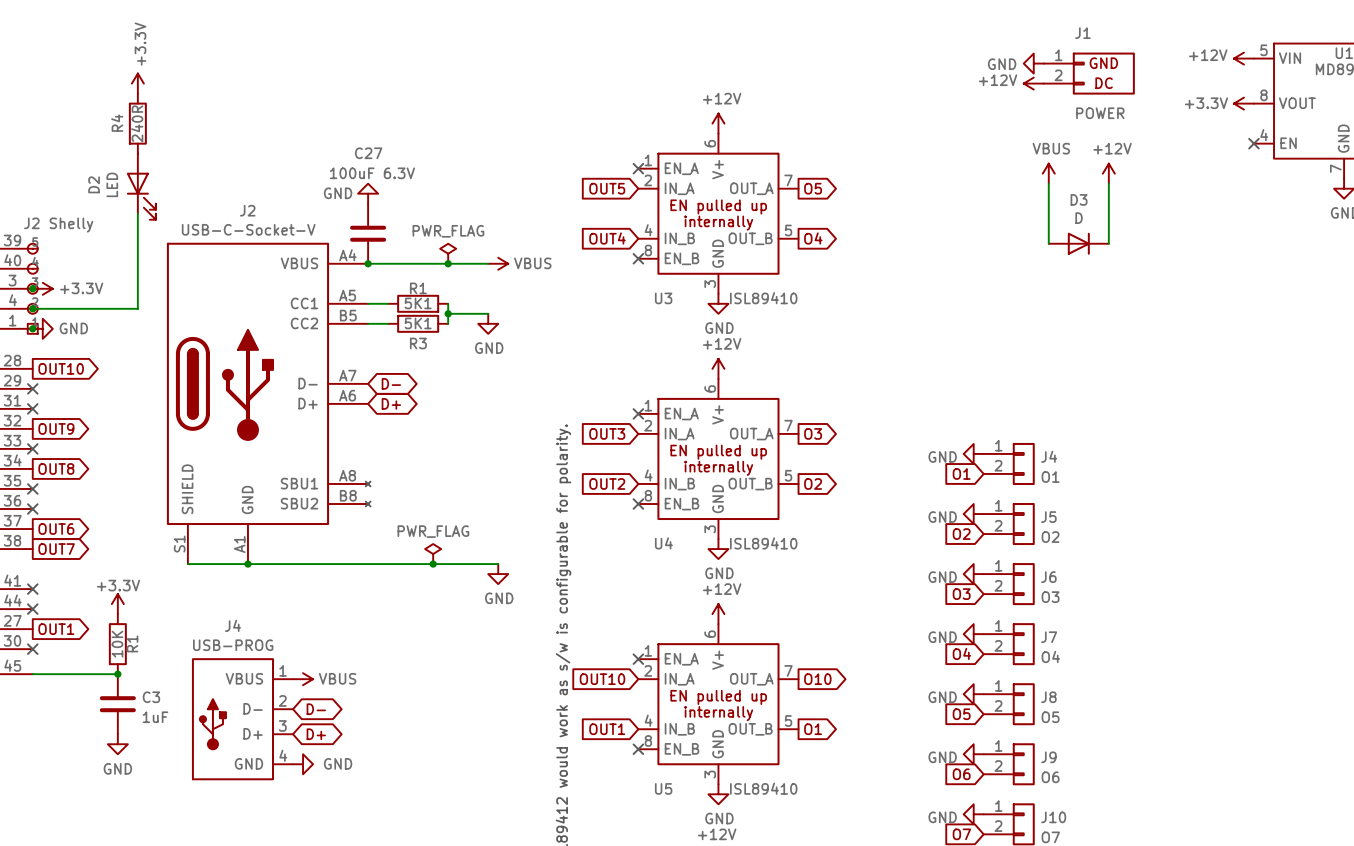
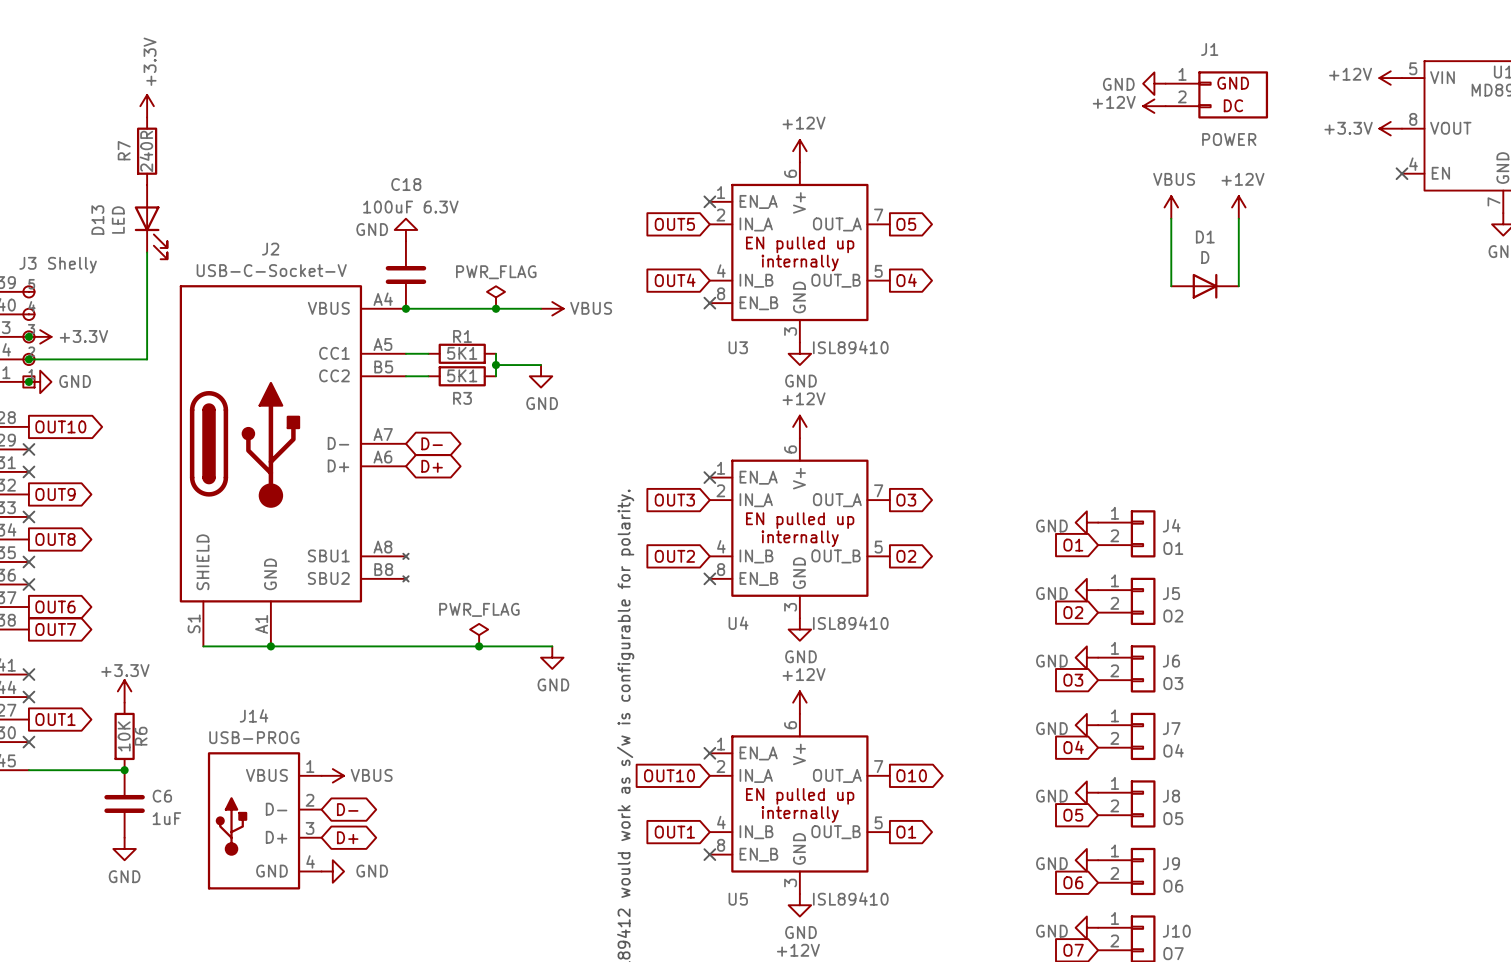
R4 name: R4 (117, 123) -> R7 (124, 150)
C27 name: C27 (368, 153) -> C18 (406, 184)
D2 name: D2 (94, 184) -> D13 (97, 220)
D3 name: D3 (1079, 199) -> D1 (1205, 236)
J2 name: J2 (31, 223) -> J3 (27, 263)
J4 name: J4 (232, 625) -> J14 (254, 715)
R1 name: R1 (132, 643) -> R6 (141, 736)
C3 name: C3 (151, 697) -> C6 (162, 796)

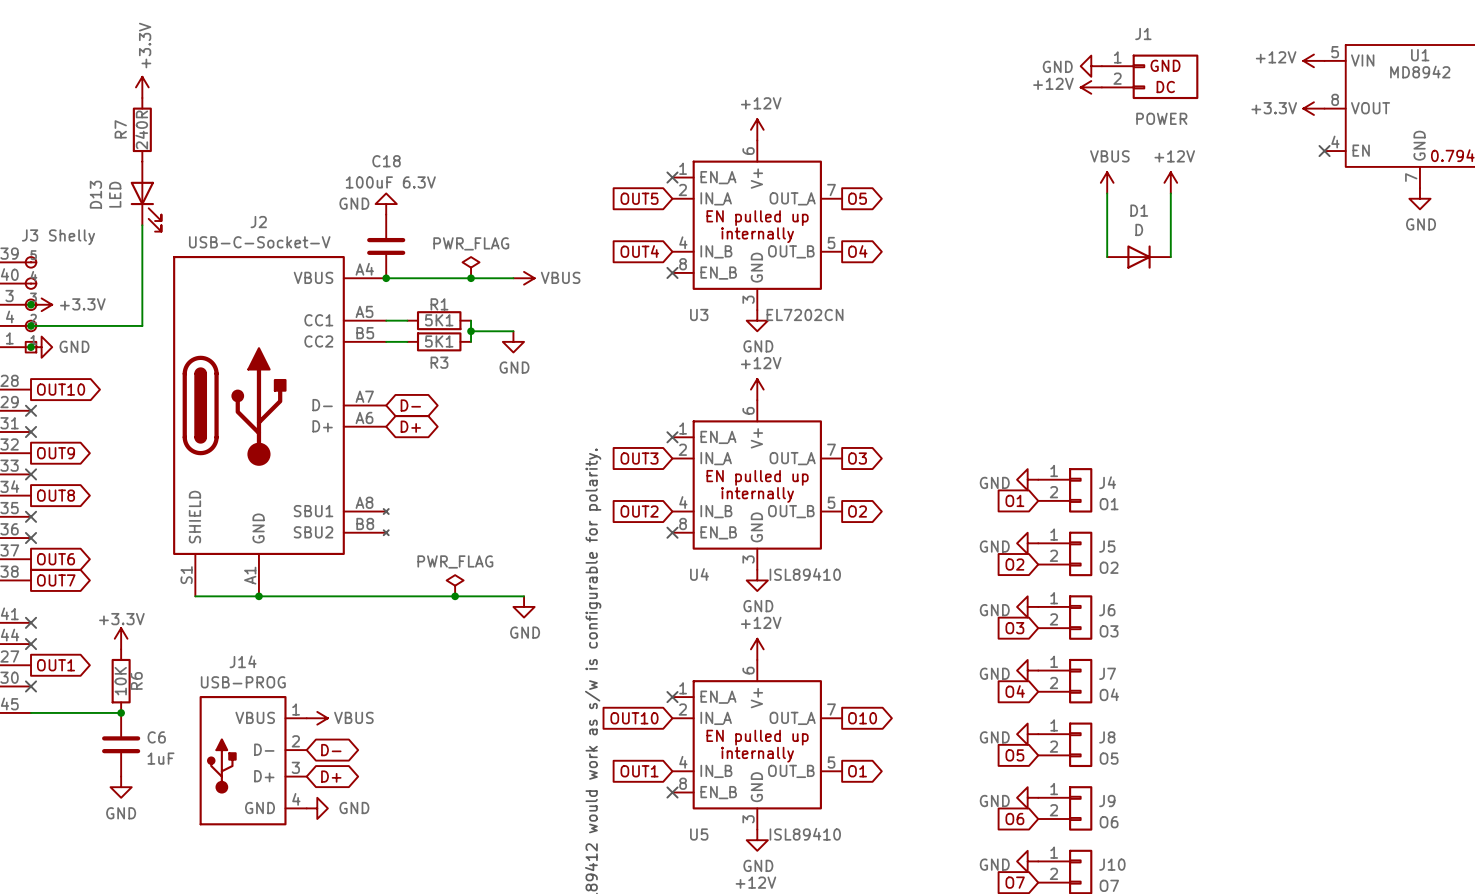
U3 value: ISL89410 (850, 347) -> EL7202CN (805, 314)

